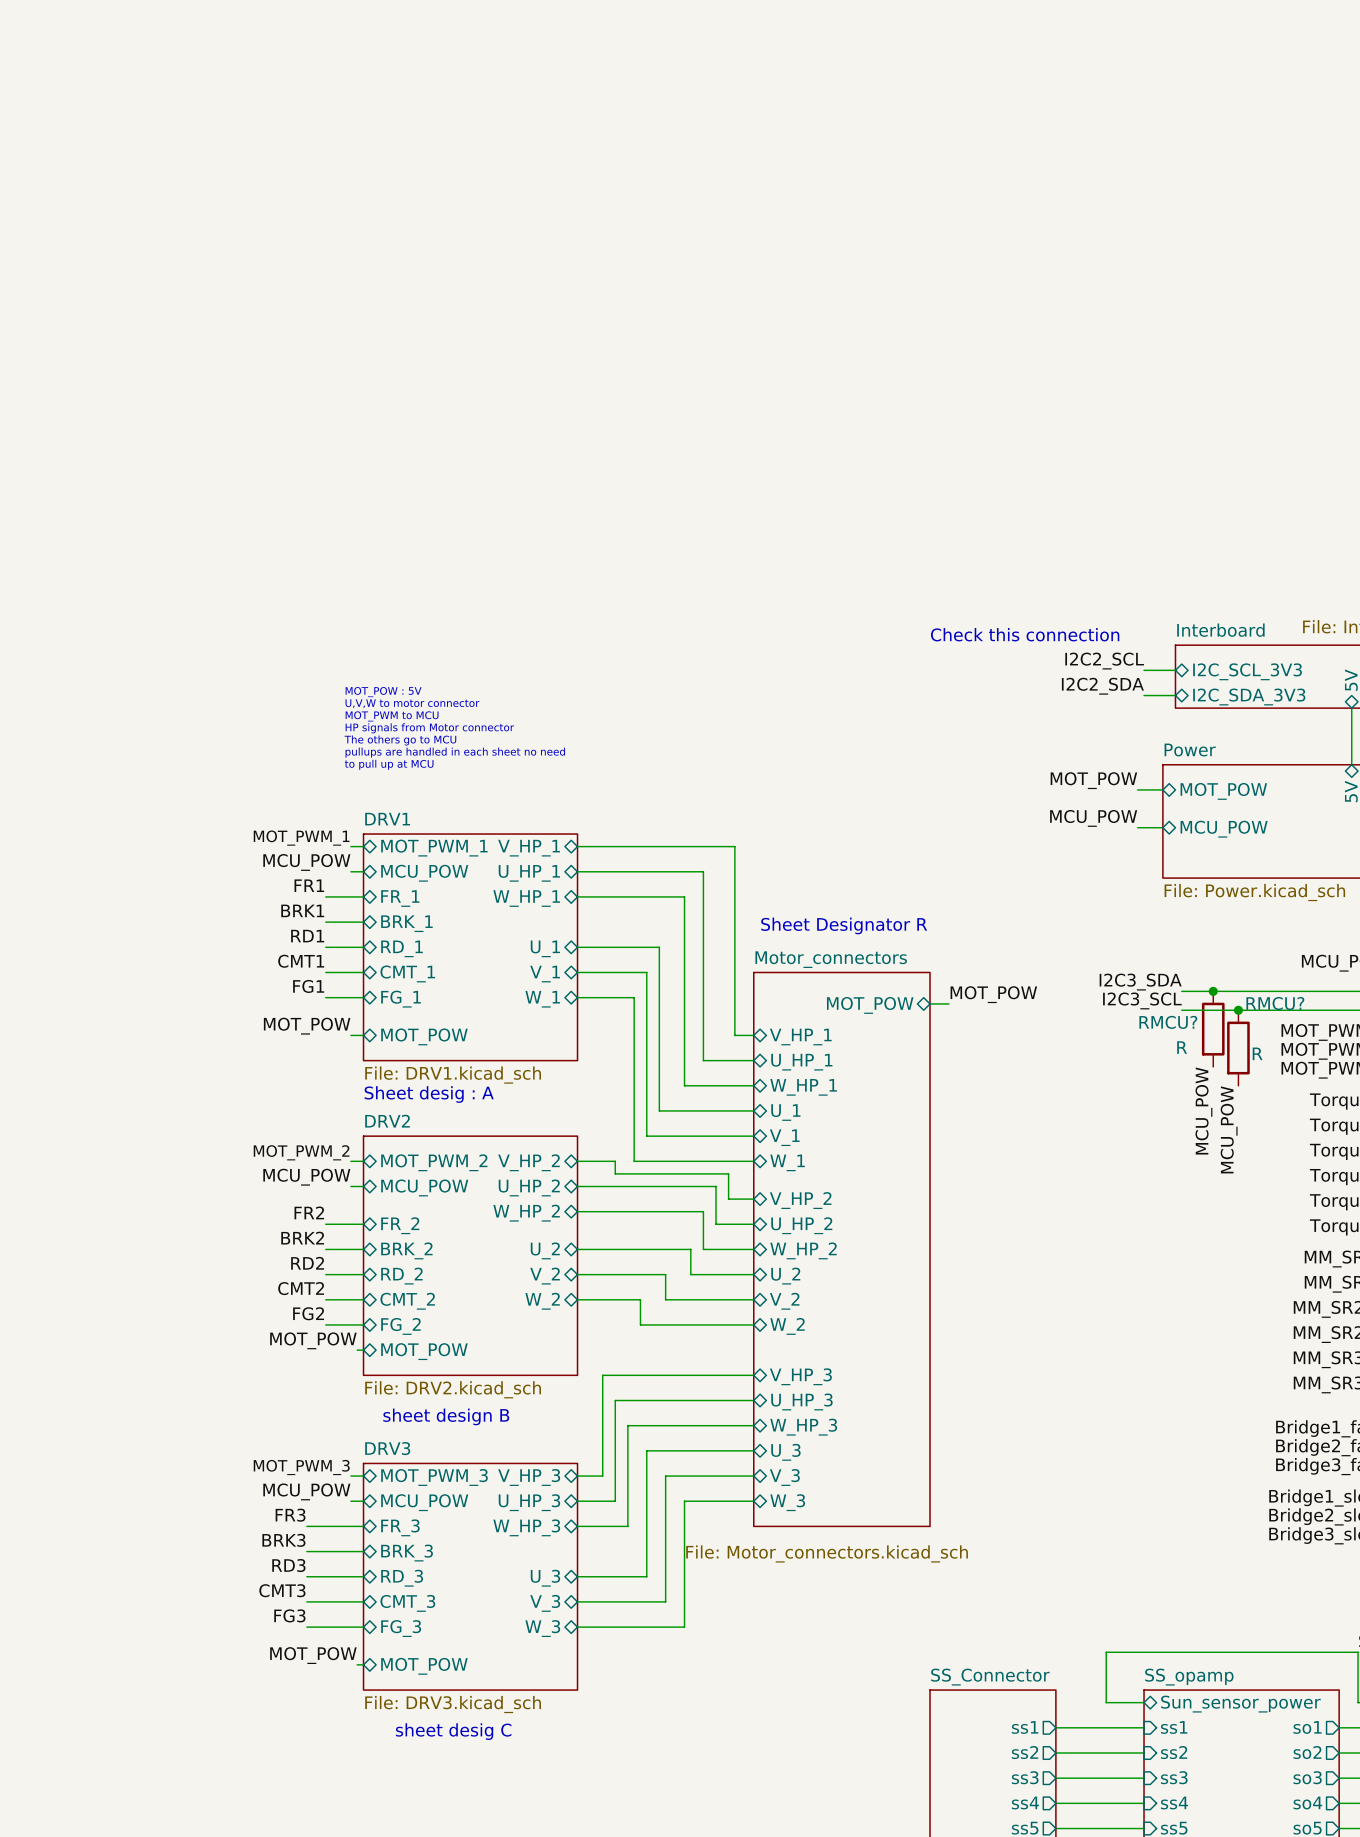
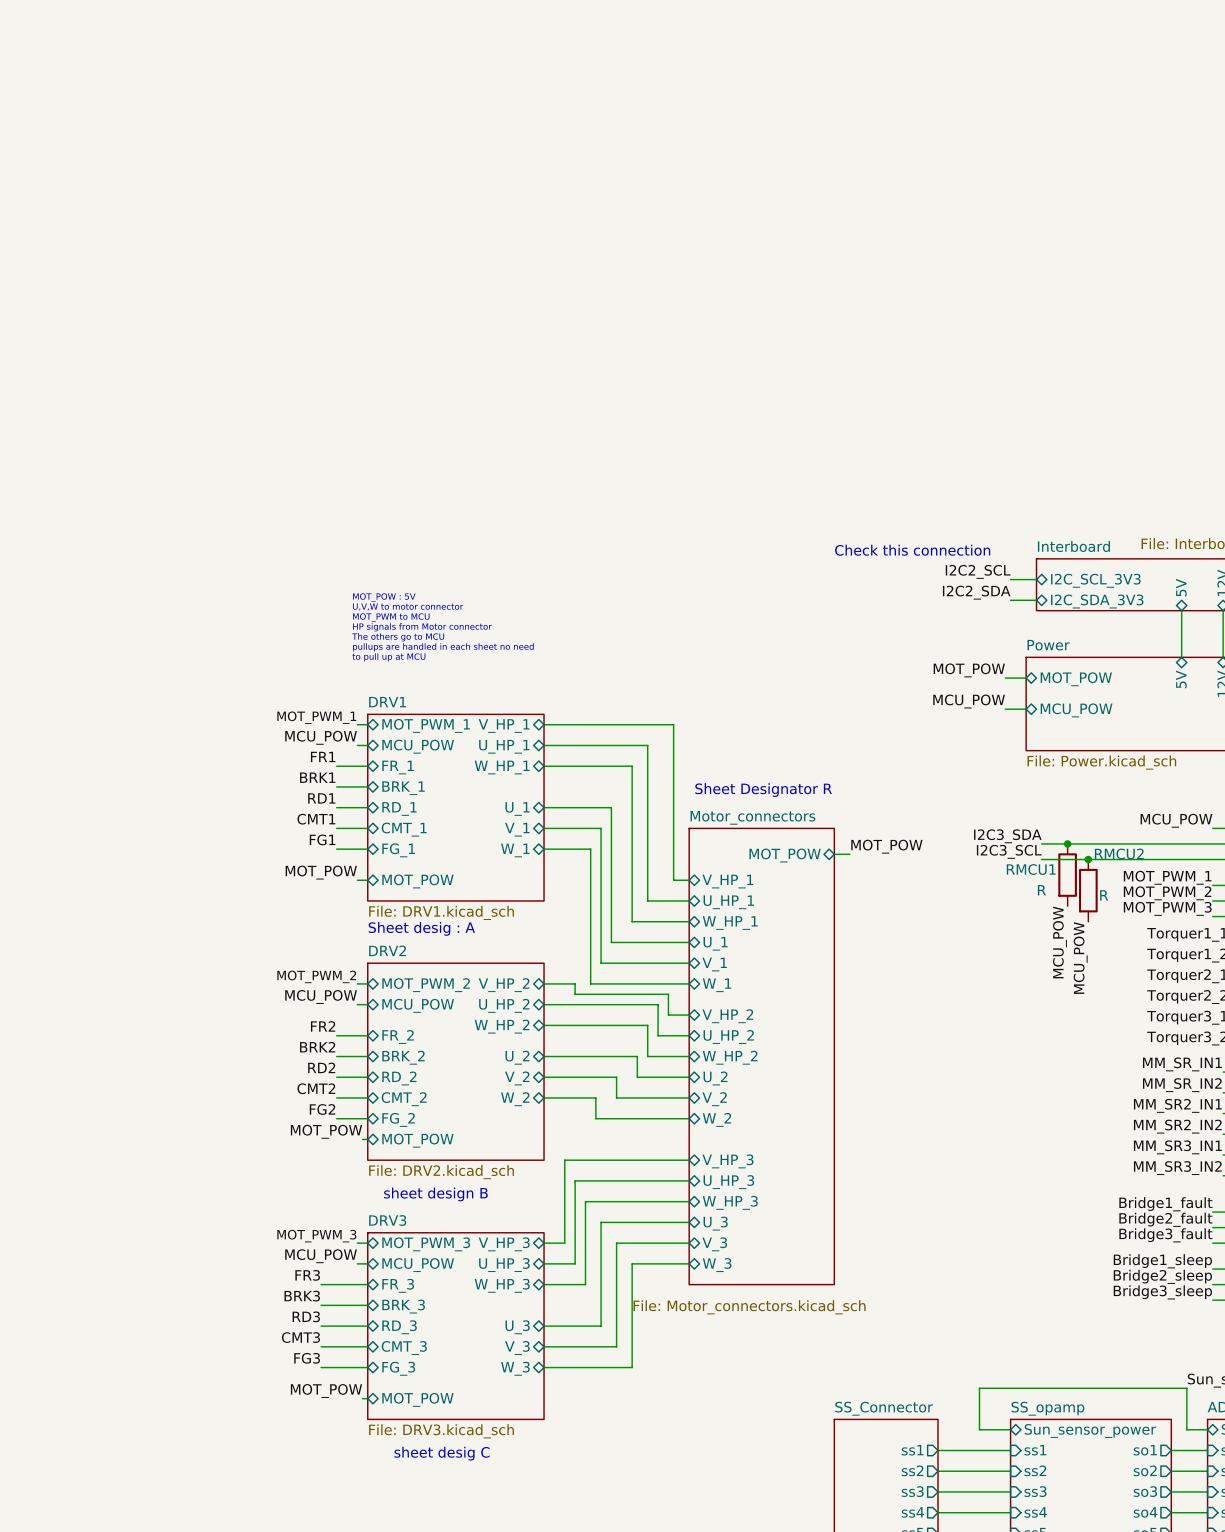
RMCU? name: RMCU? (1275, 1003) -> RMCU2 (1119, 853)
RMCU? name: RMCU? (1168, 1022) -> RMCU1 (1031, 869)

